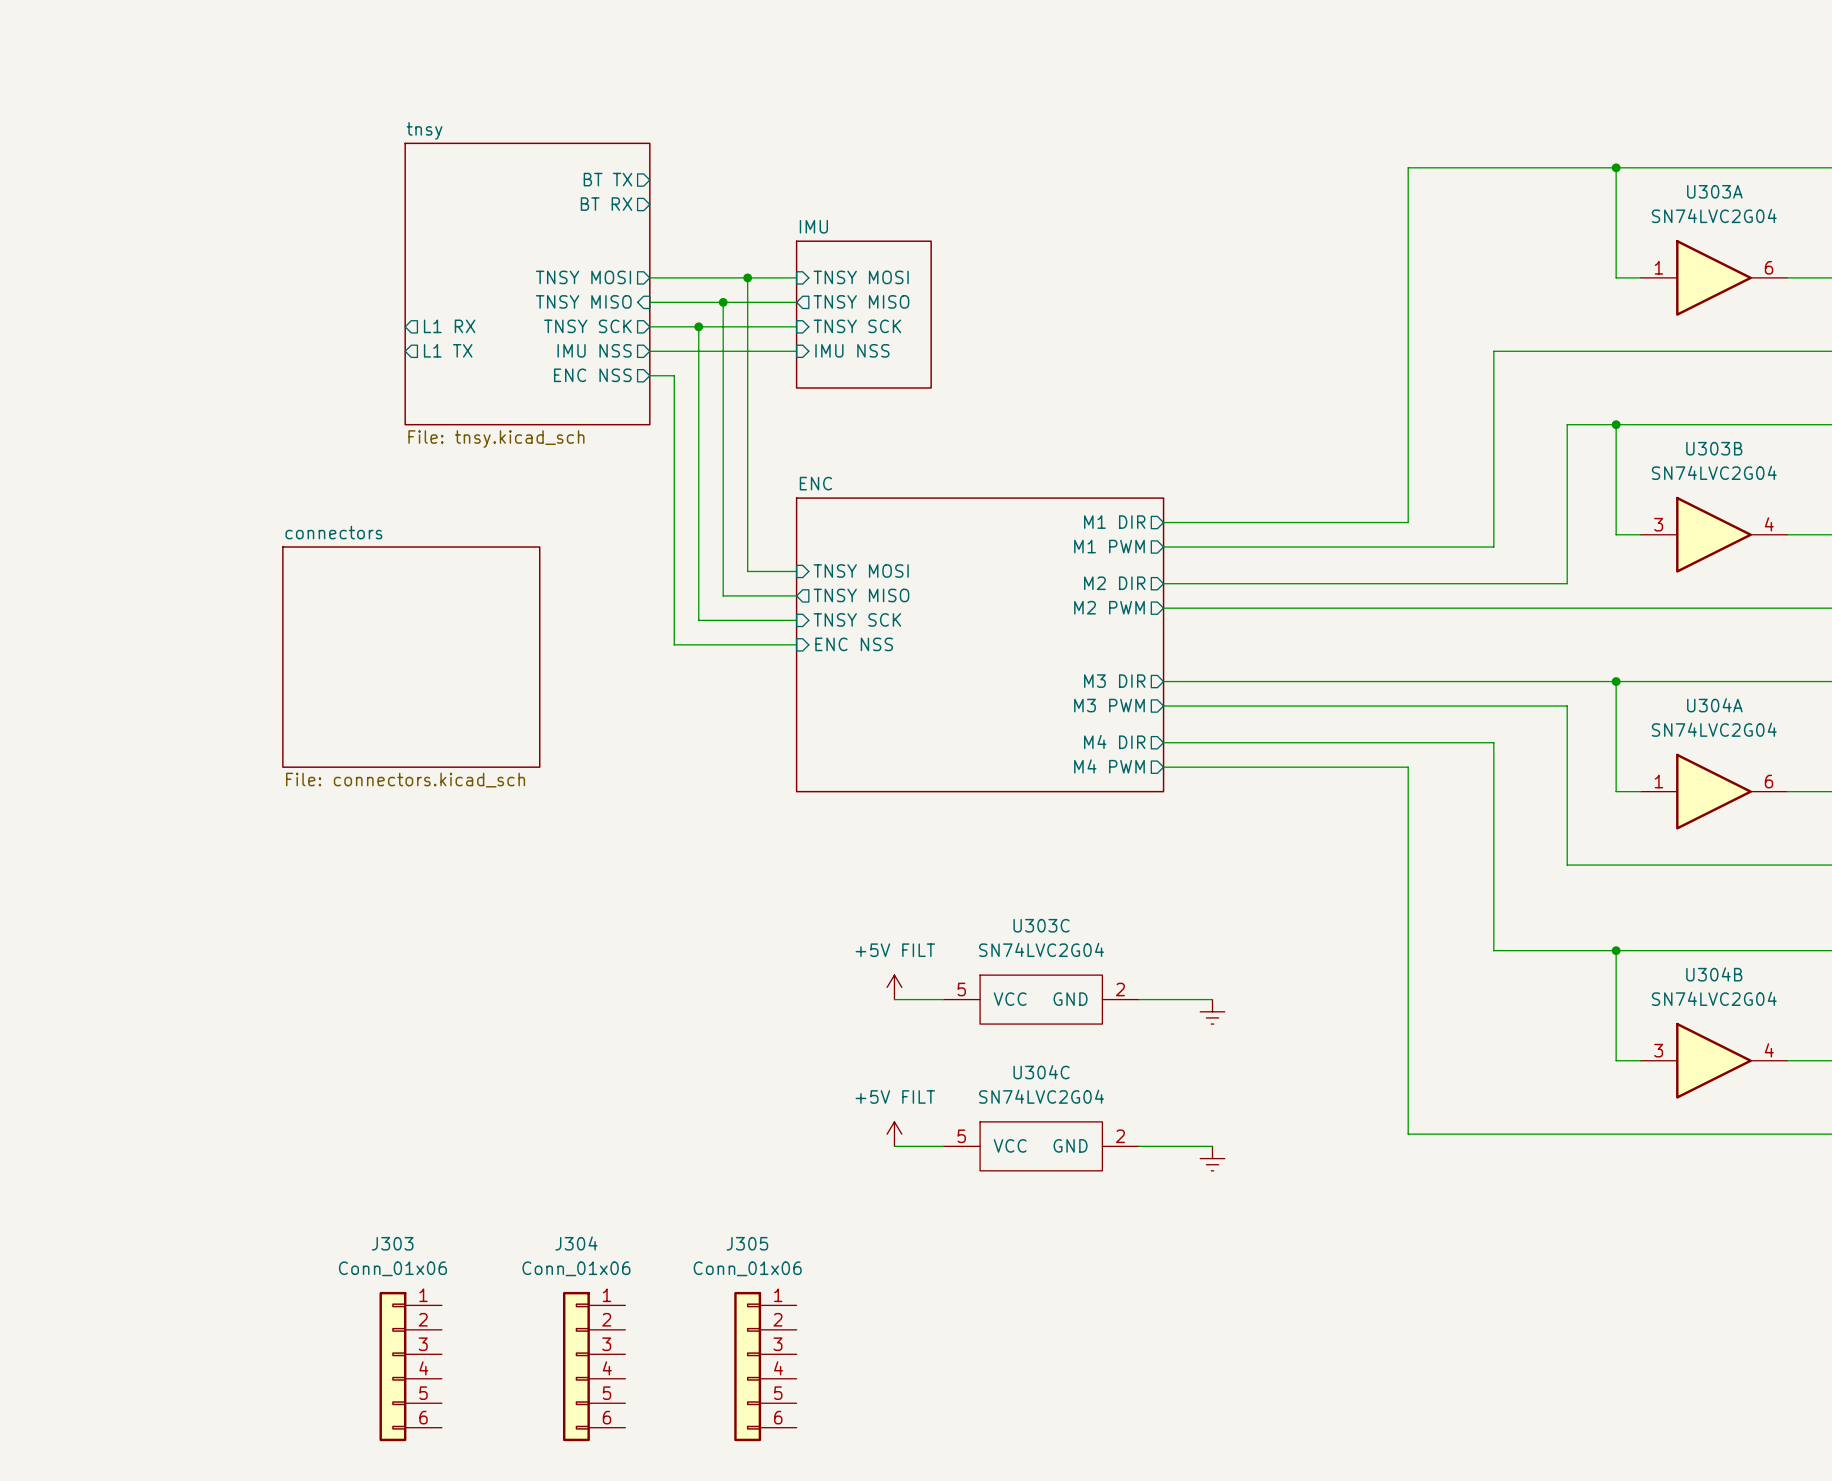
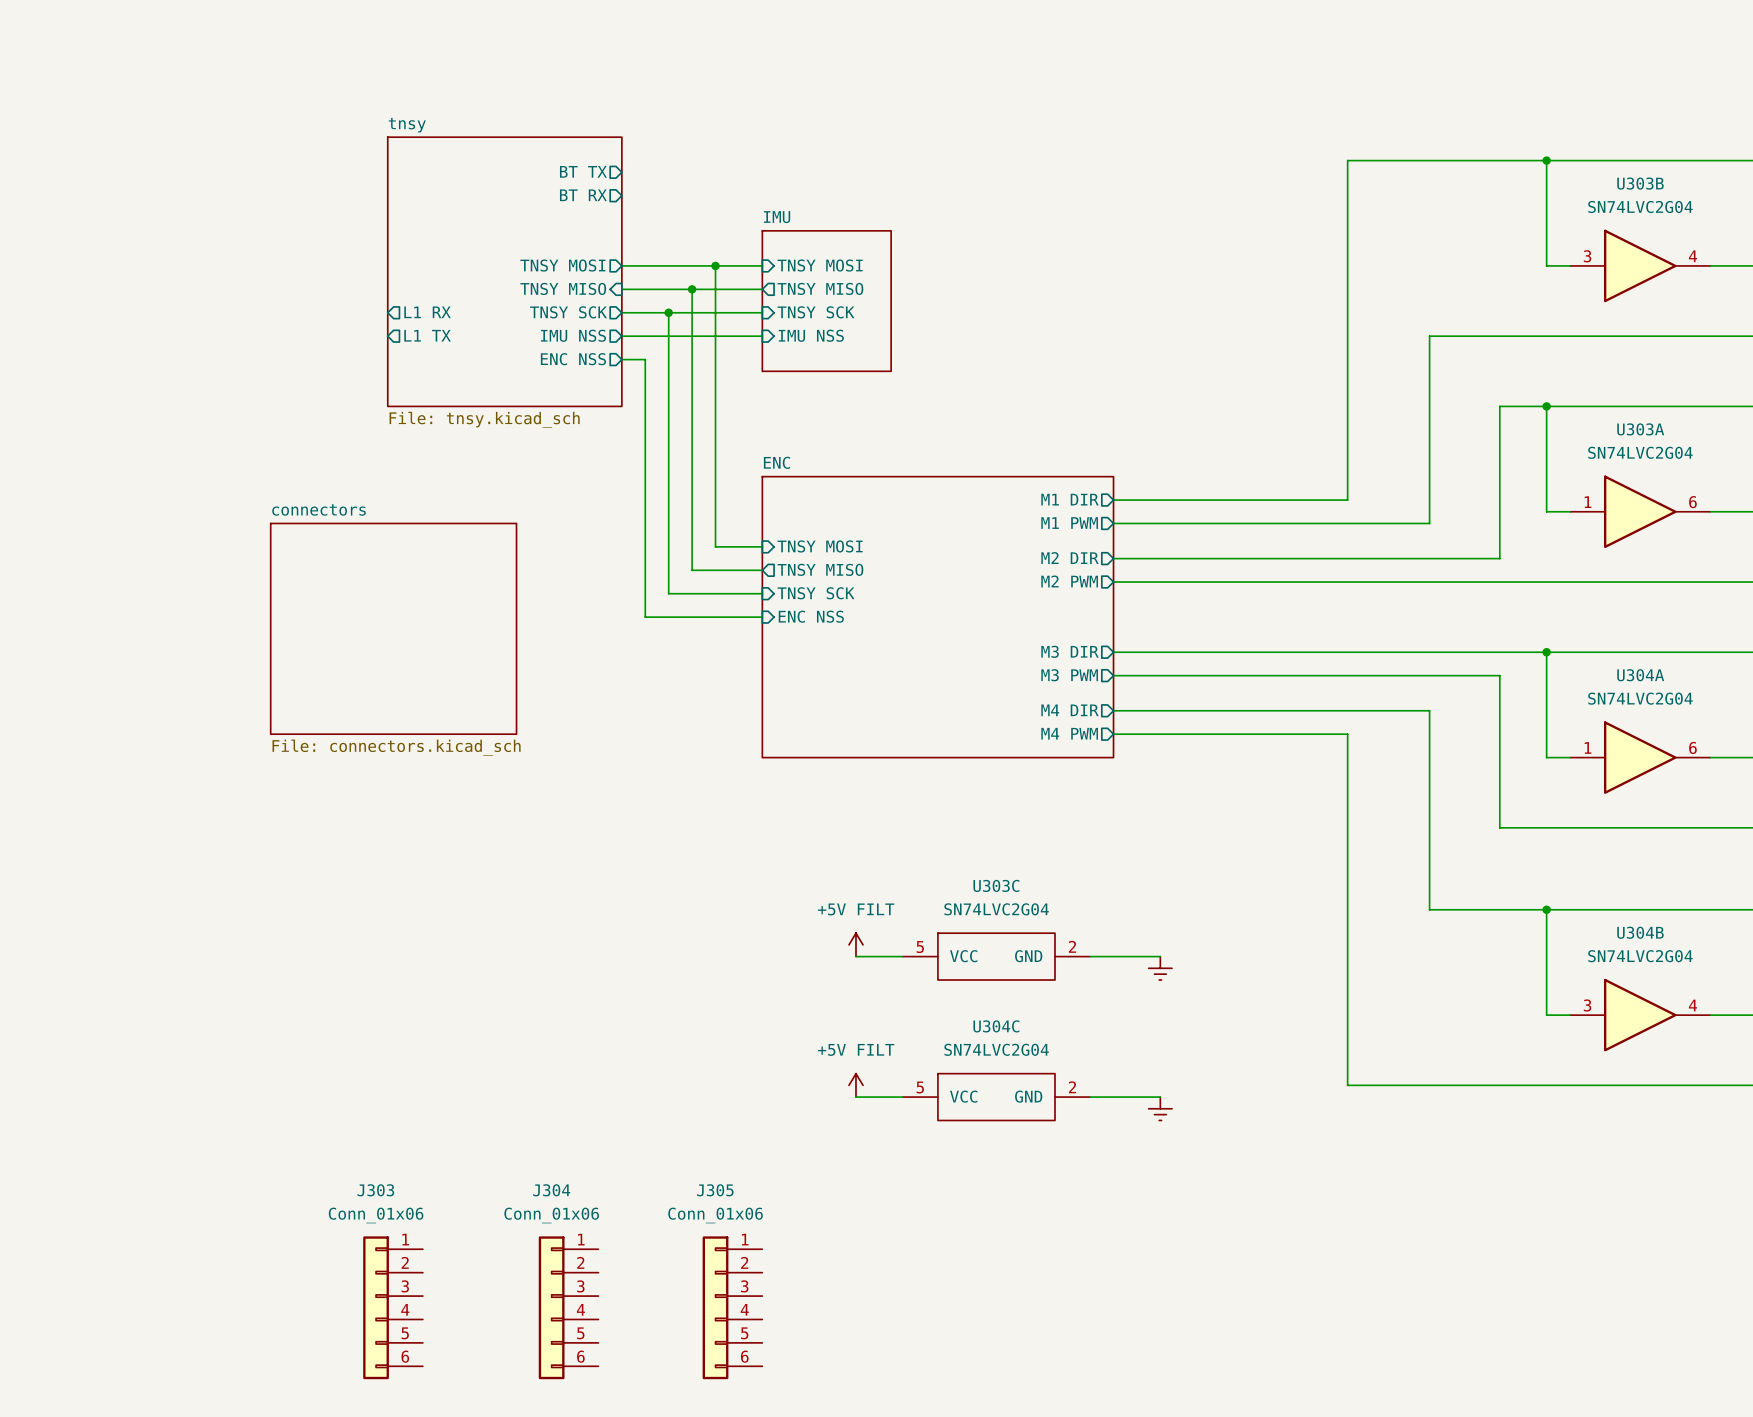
U303A position: (1713, 277) -> (1640, 511)
U303B position: (1713, 534) -> (1640, 265)

